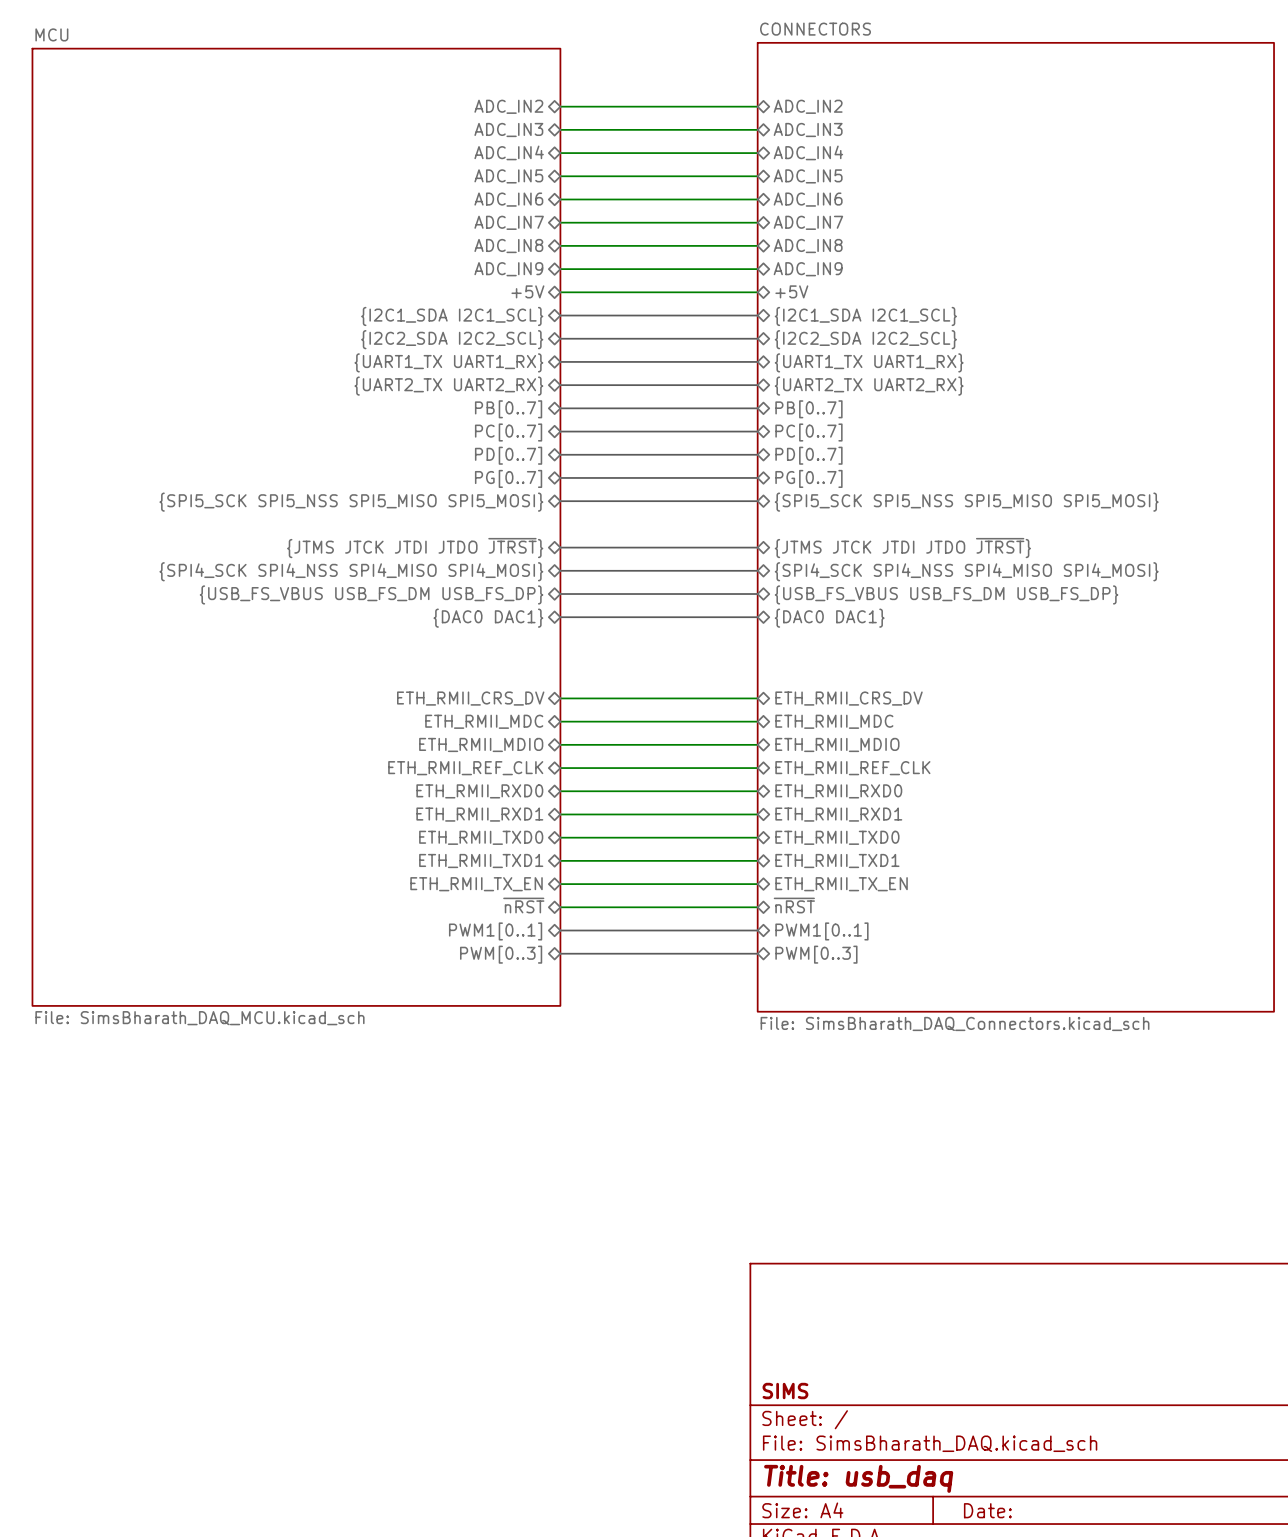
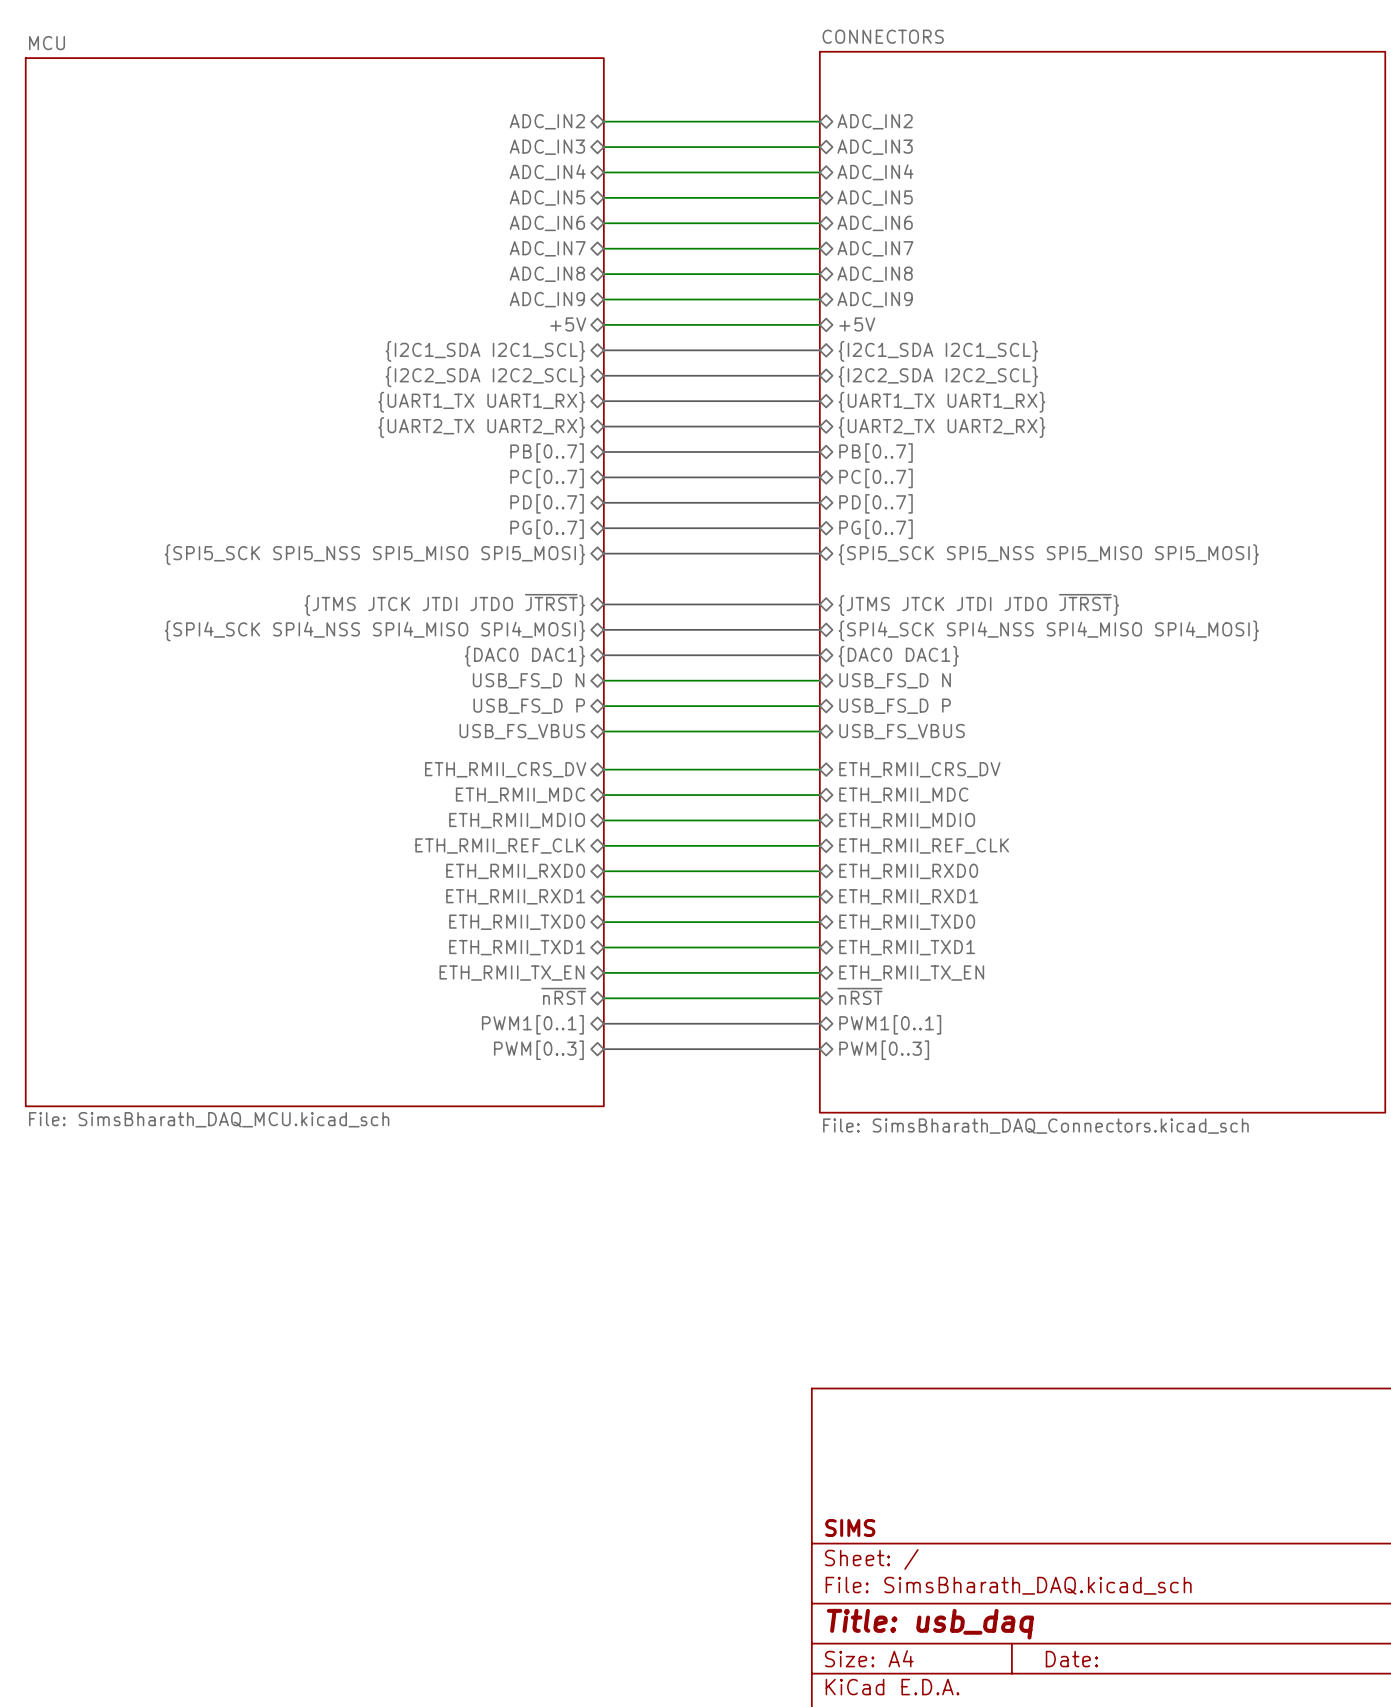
sheet pin: {USB_FS_VBUS USB_FS_DM USB_FS_DP} (371, 594) -> {DAC0 DAC1} (524, 656)
sheet pin: {USB_FS_VBUS USB_FS_DM USB_FS_DP} (946, 594) -> {DAC0 DAC1} (898, 656)
bus: (560, 617) (757, 617) -> none
sheet pin: {DAC0 DAC1} (488, 618) -> USB_FS_D N (528, 680)
sheet pin: {DAC0 DAC1} (829, 618) -> USB_FS_D N (895, 680)
sheet pin: none -> USB_FS_D P (529, 706)
wire: none -> (603, 706) (819, 706)
sheet pin: none -> USB_FS_D P (895, 706)
sheet pin: none -> USB_FS_VBUS (522, 731)
wire: none -> (603, 731) (819, 731)
sheet pin: none -> USB_FS_VBUS (902, 731)

